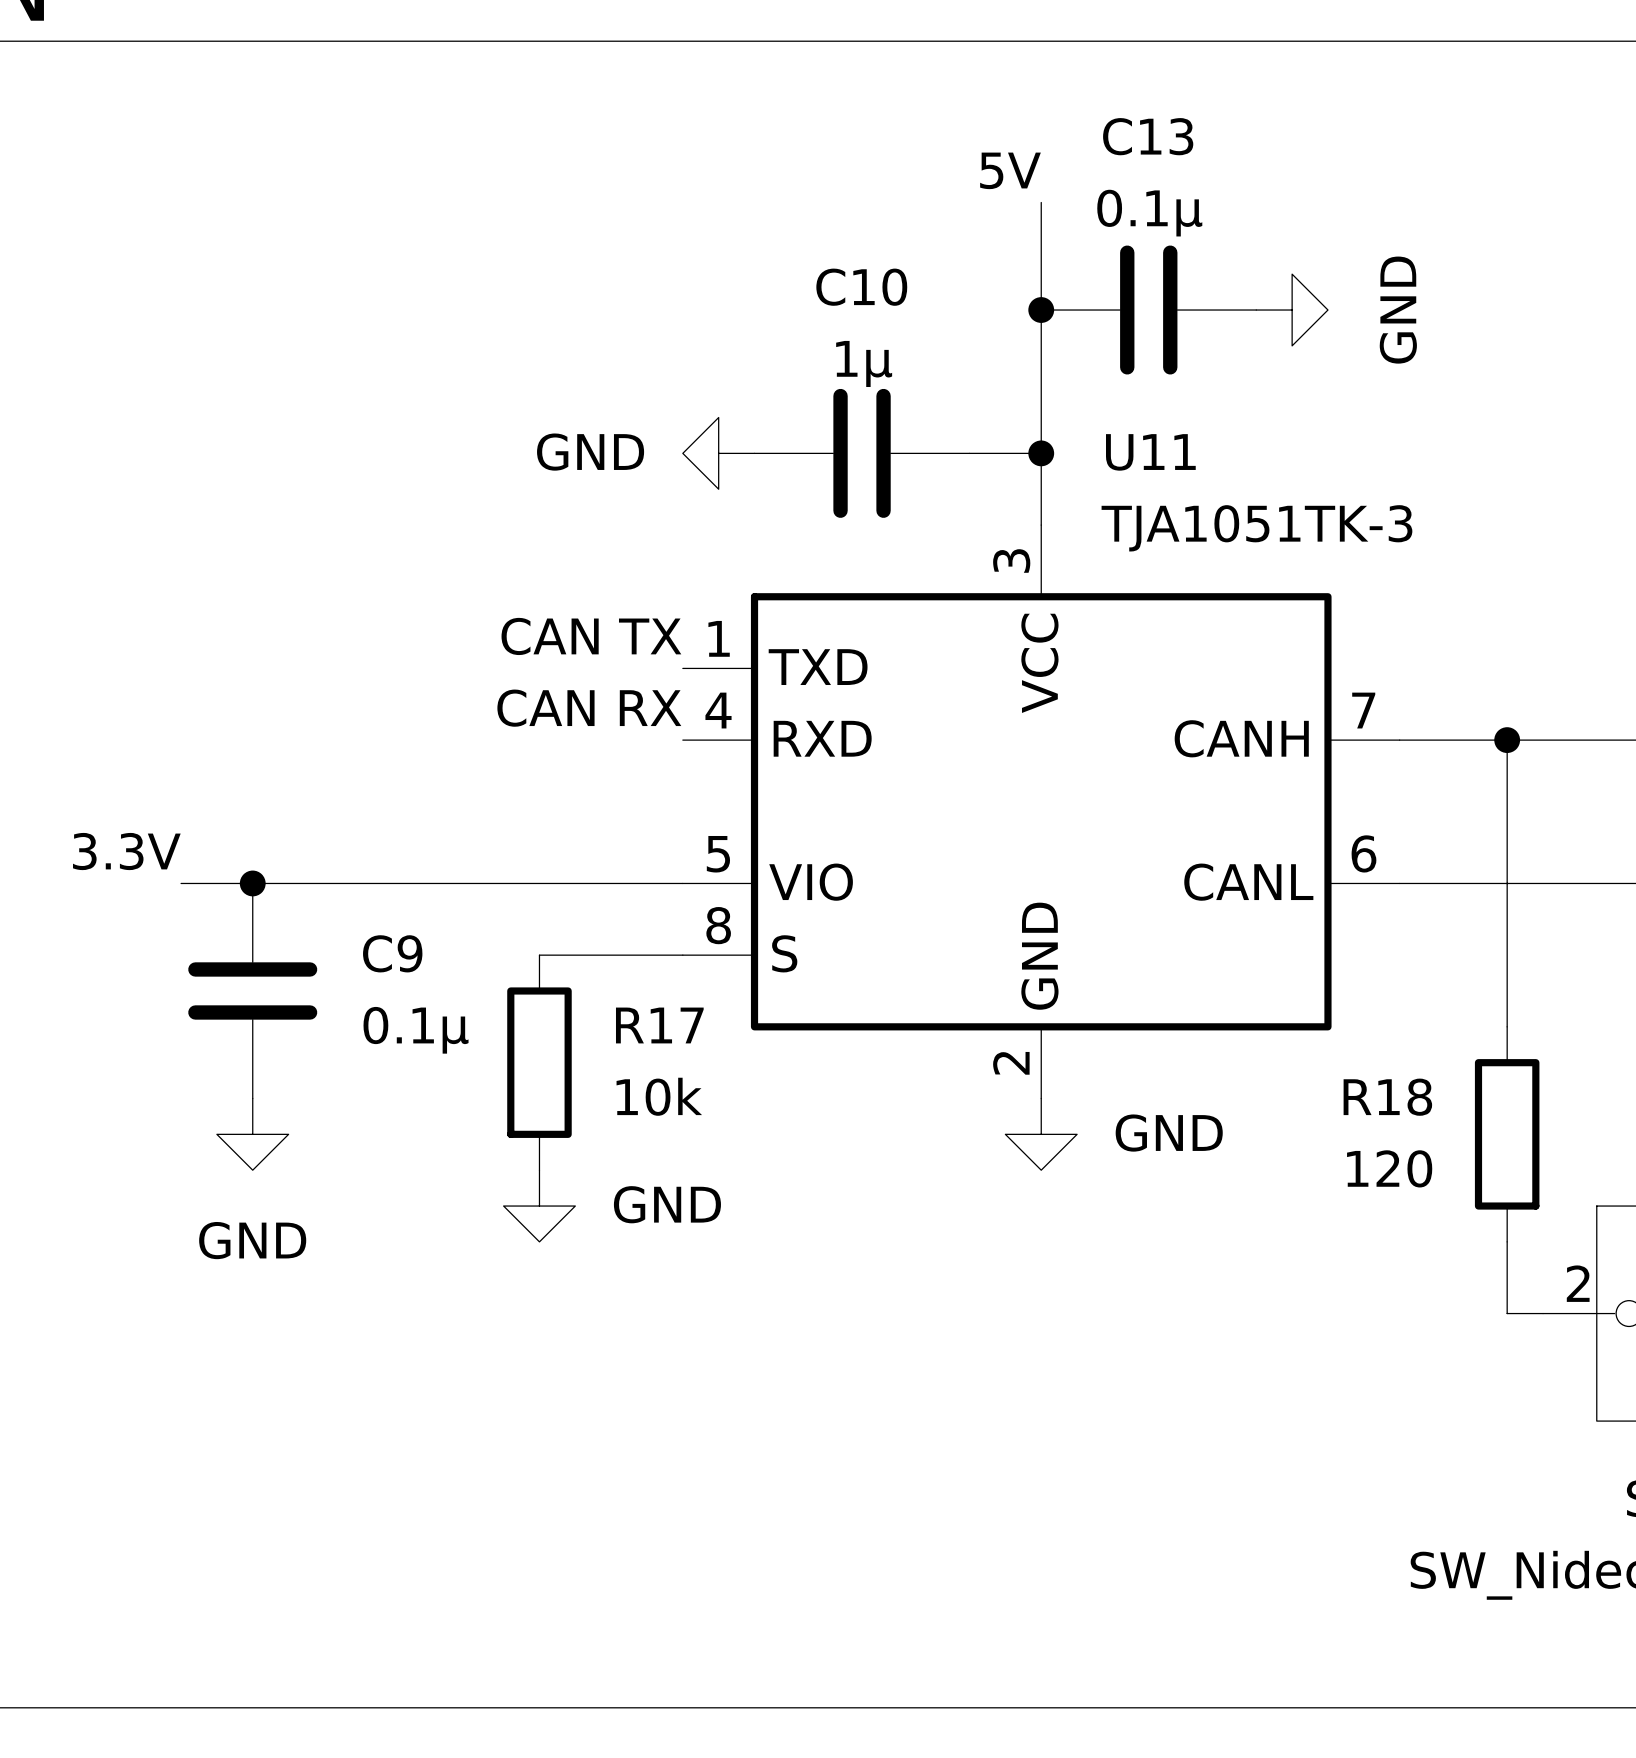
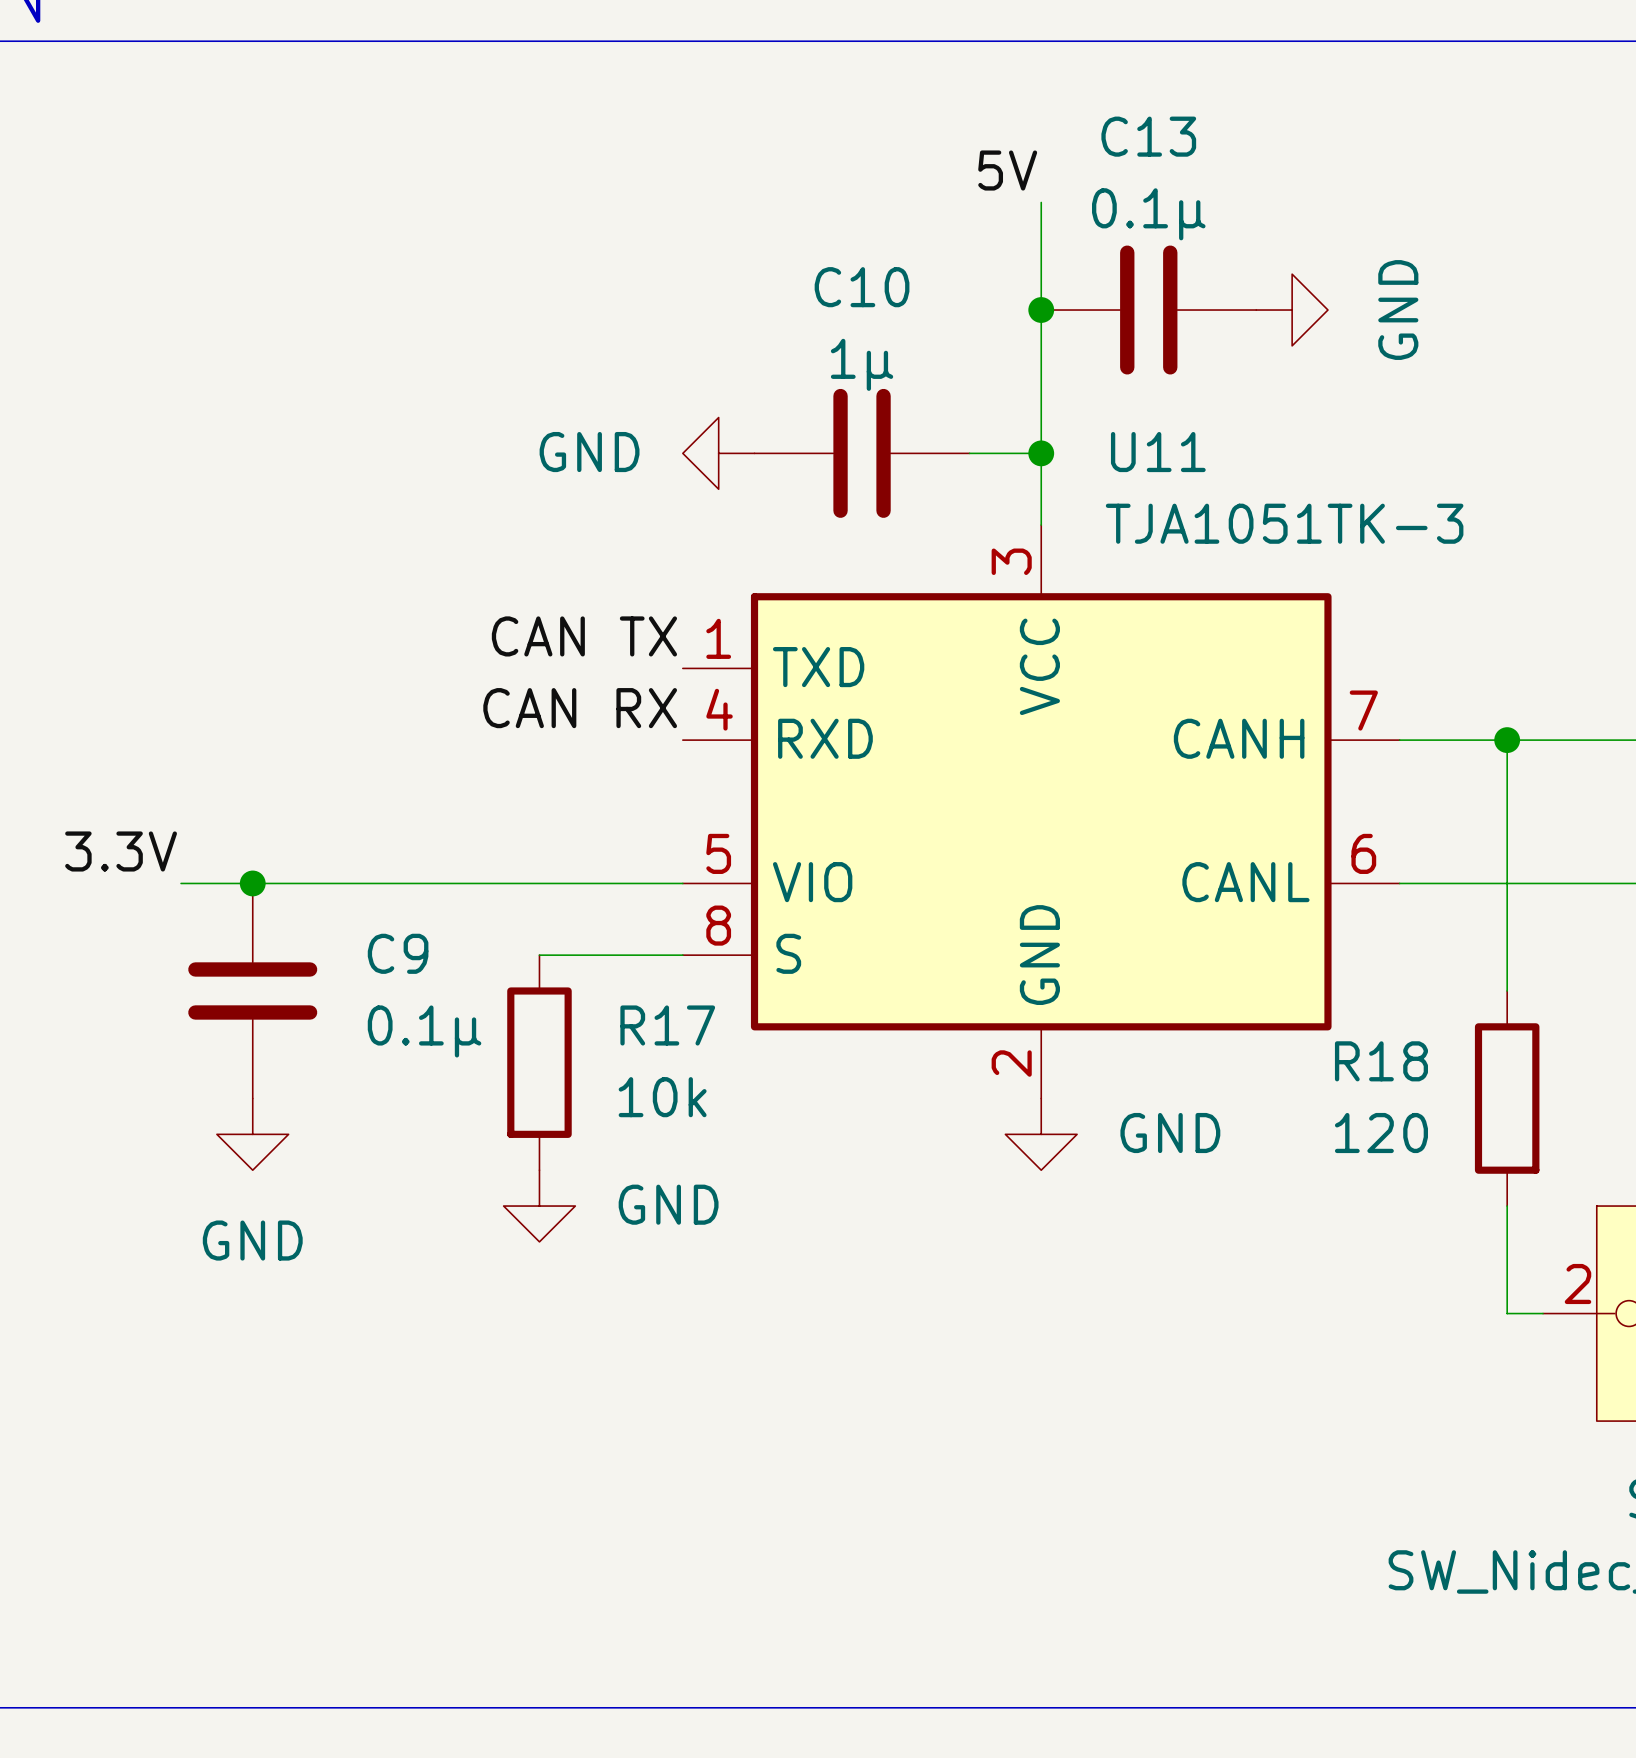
R18 position: (1507, 1134) -> (1507, 1098)

